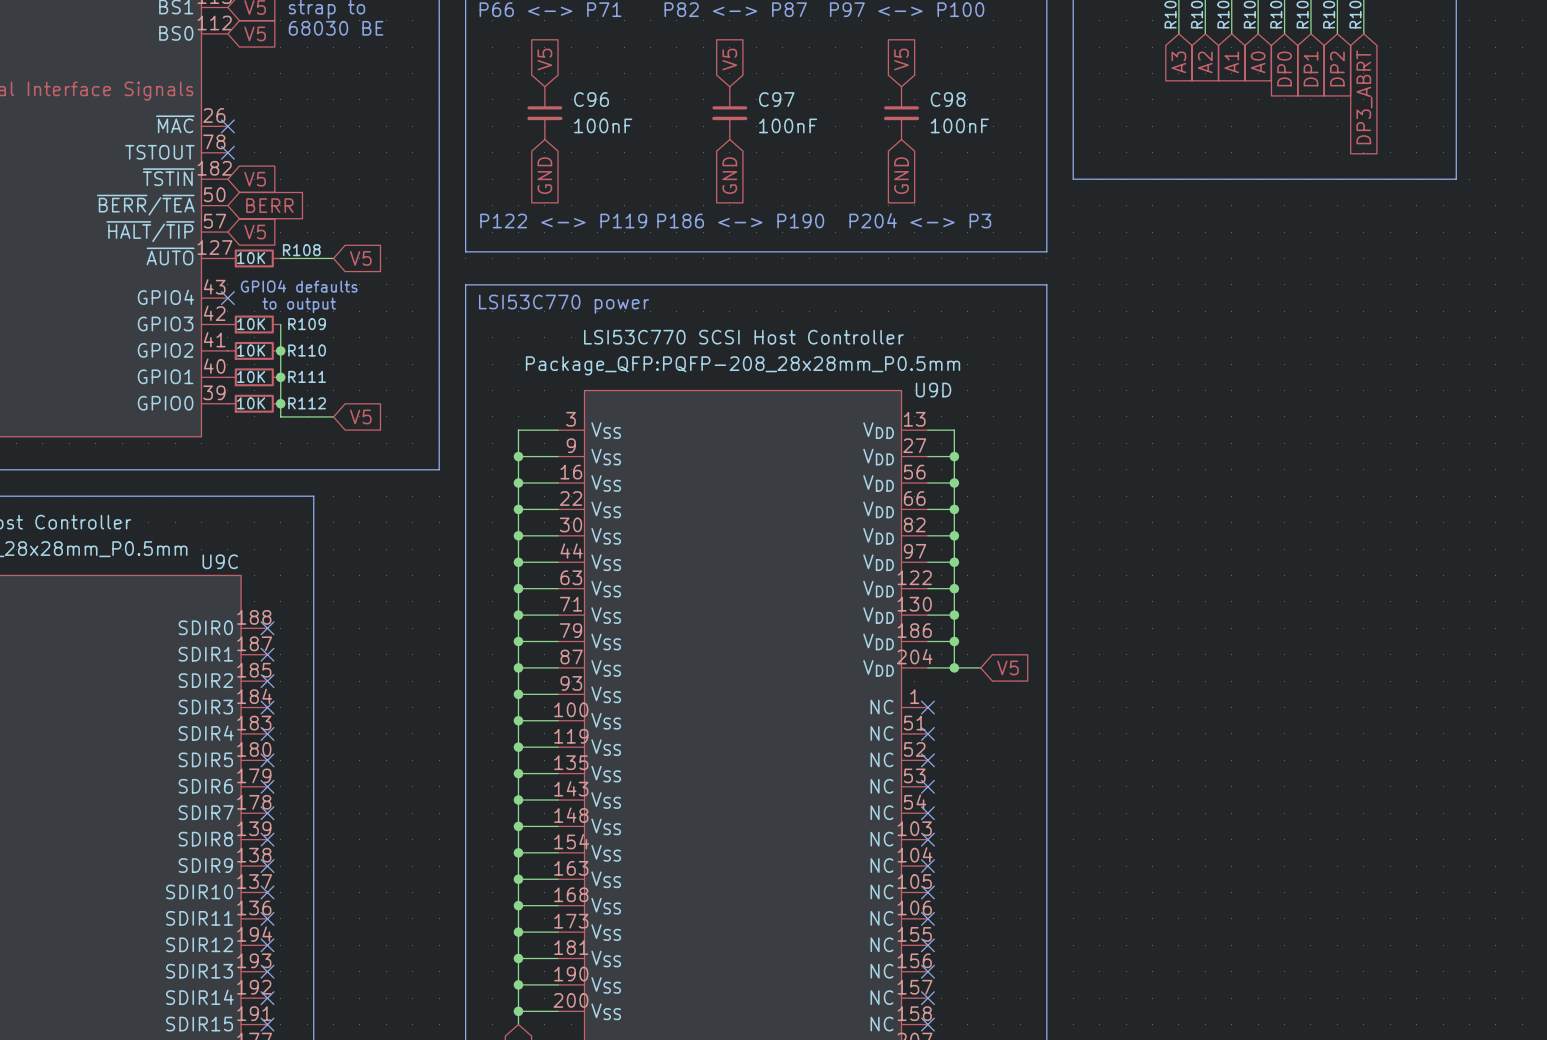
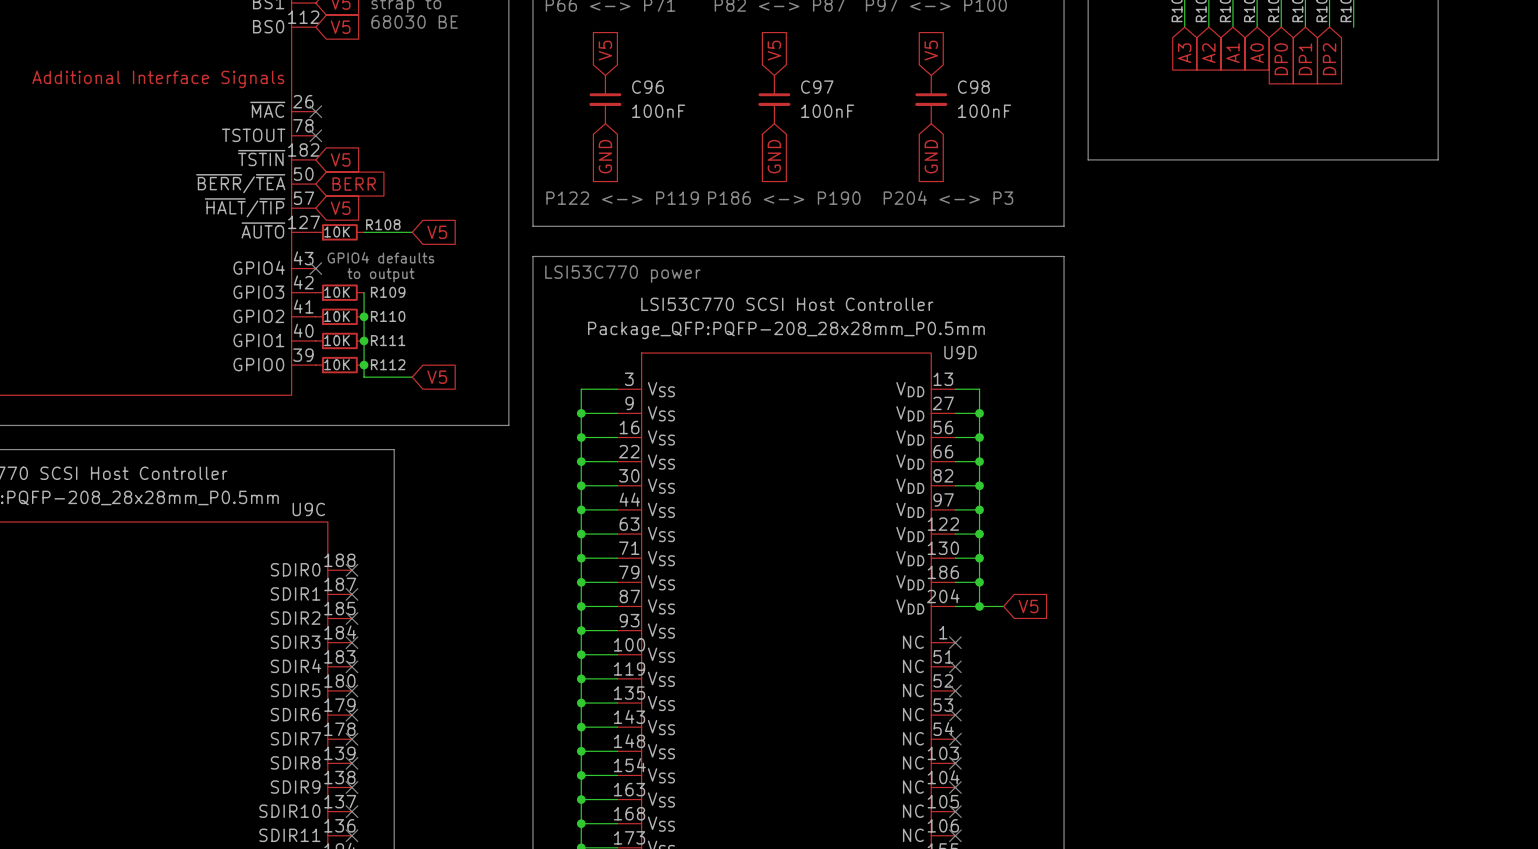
global label: DP3_ABRT (1364, 97) -> none

